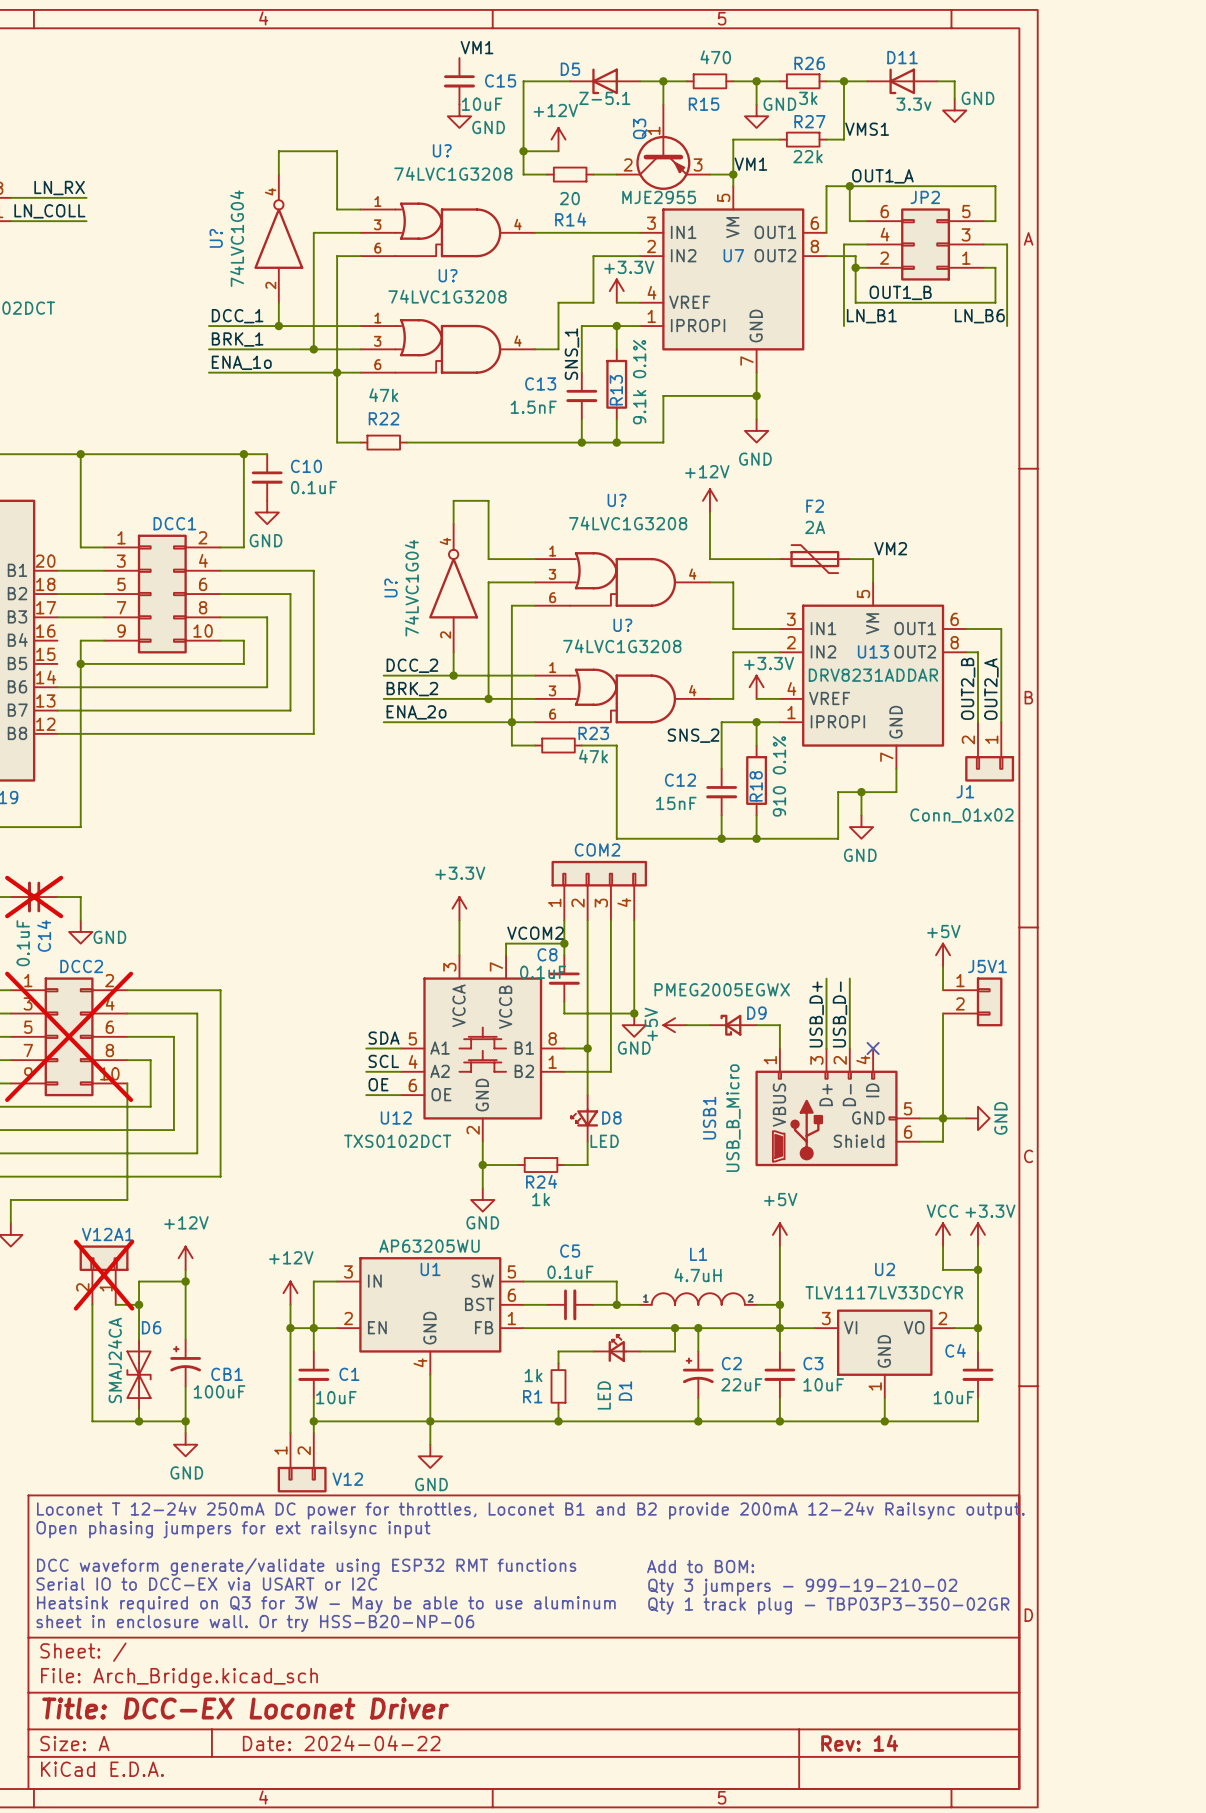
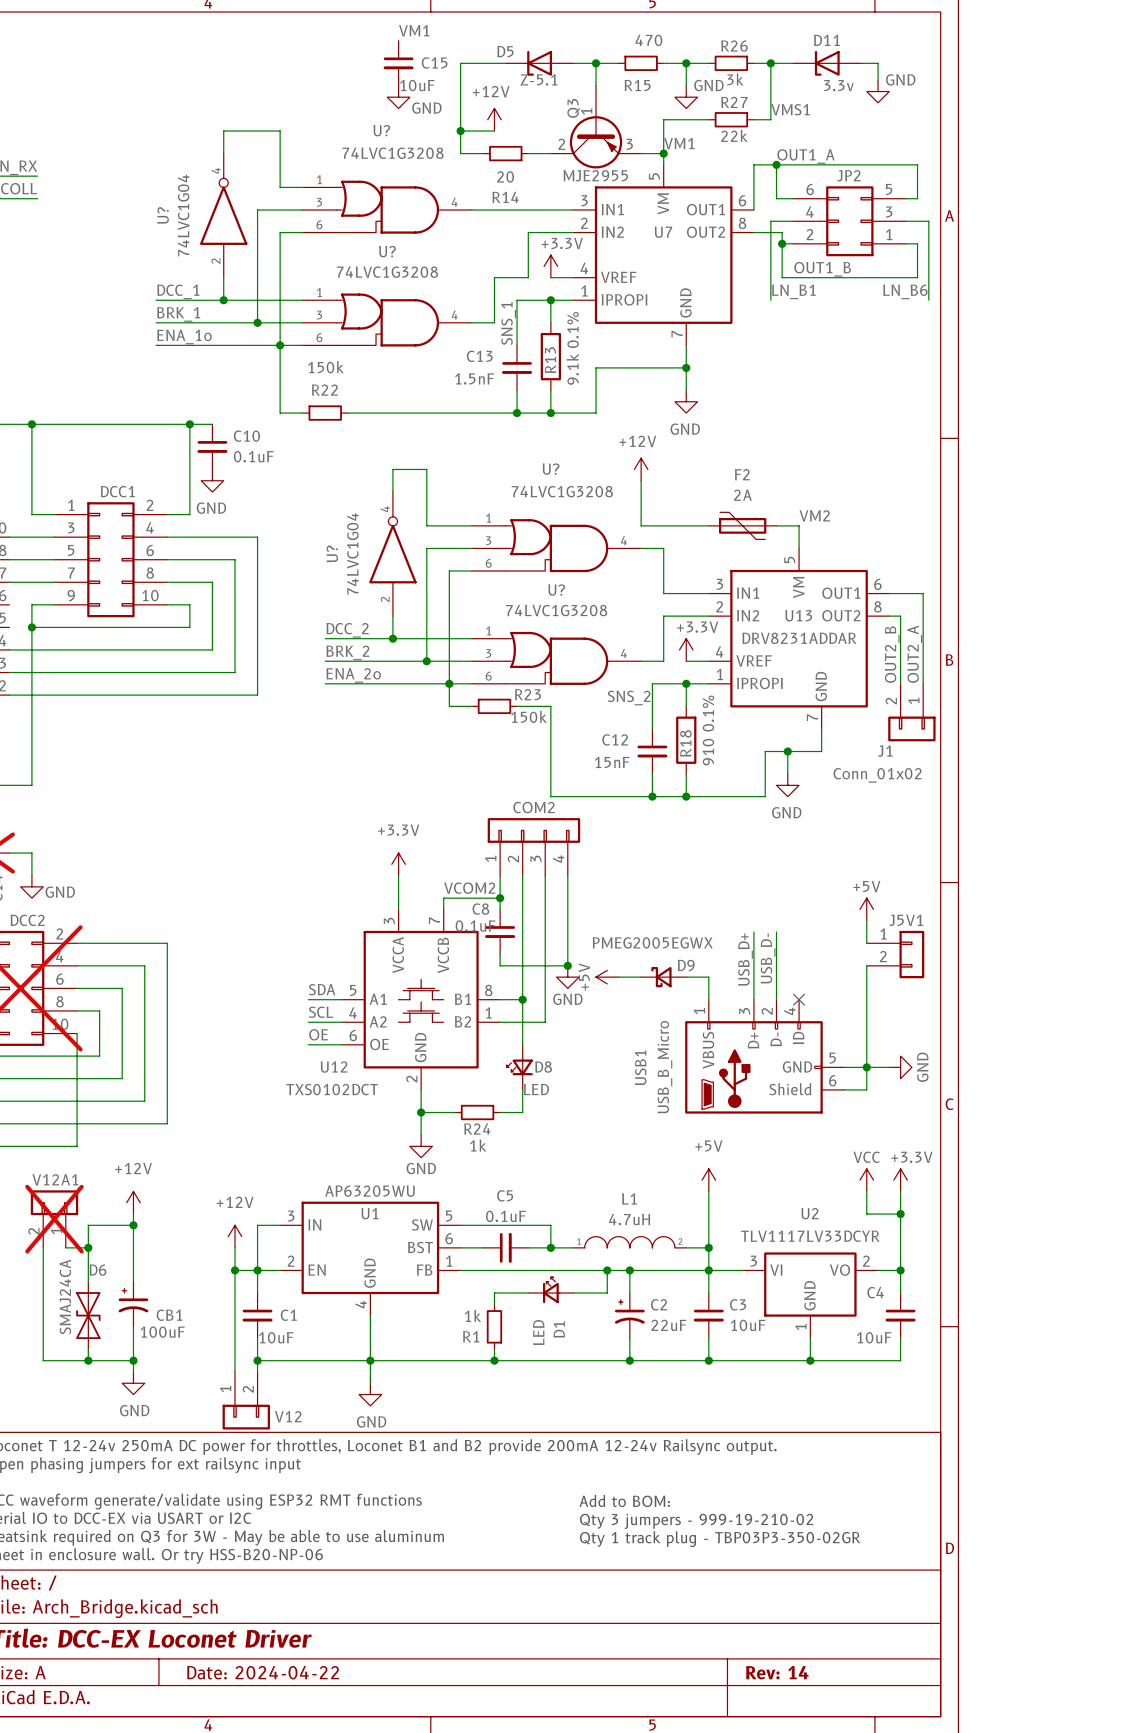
R22 value: 47k (383, 395) -> 150k (325, 367)
R23 value: 47k (593, 756) -> 150k (529, 716)

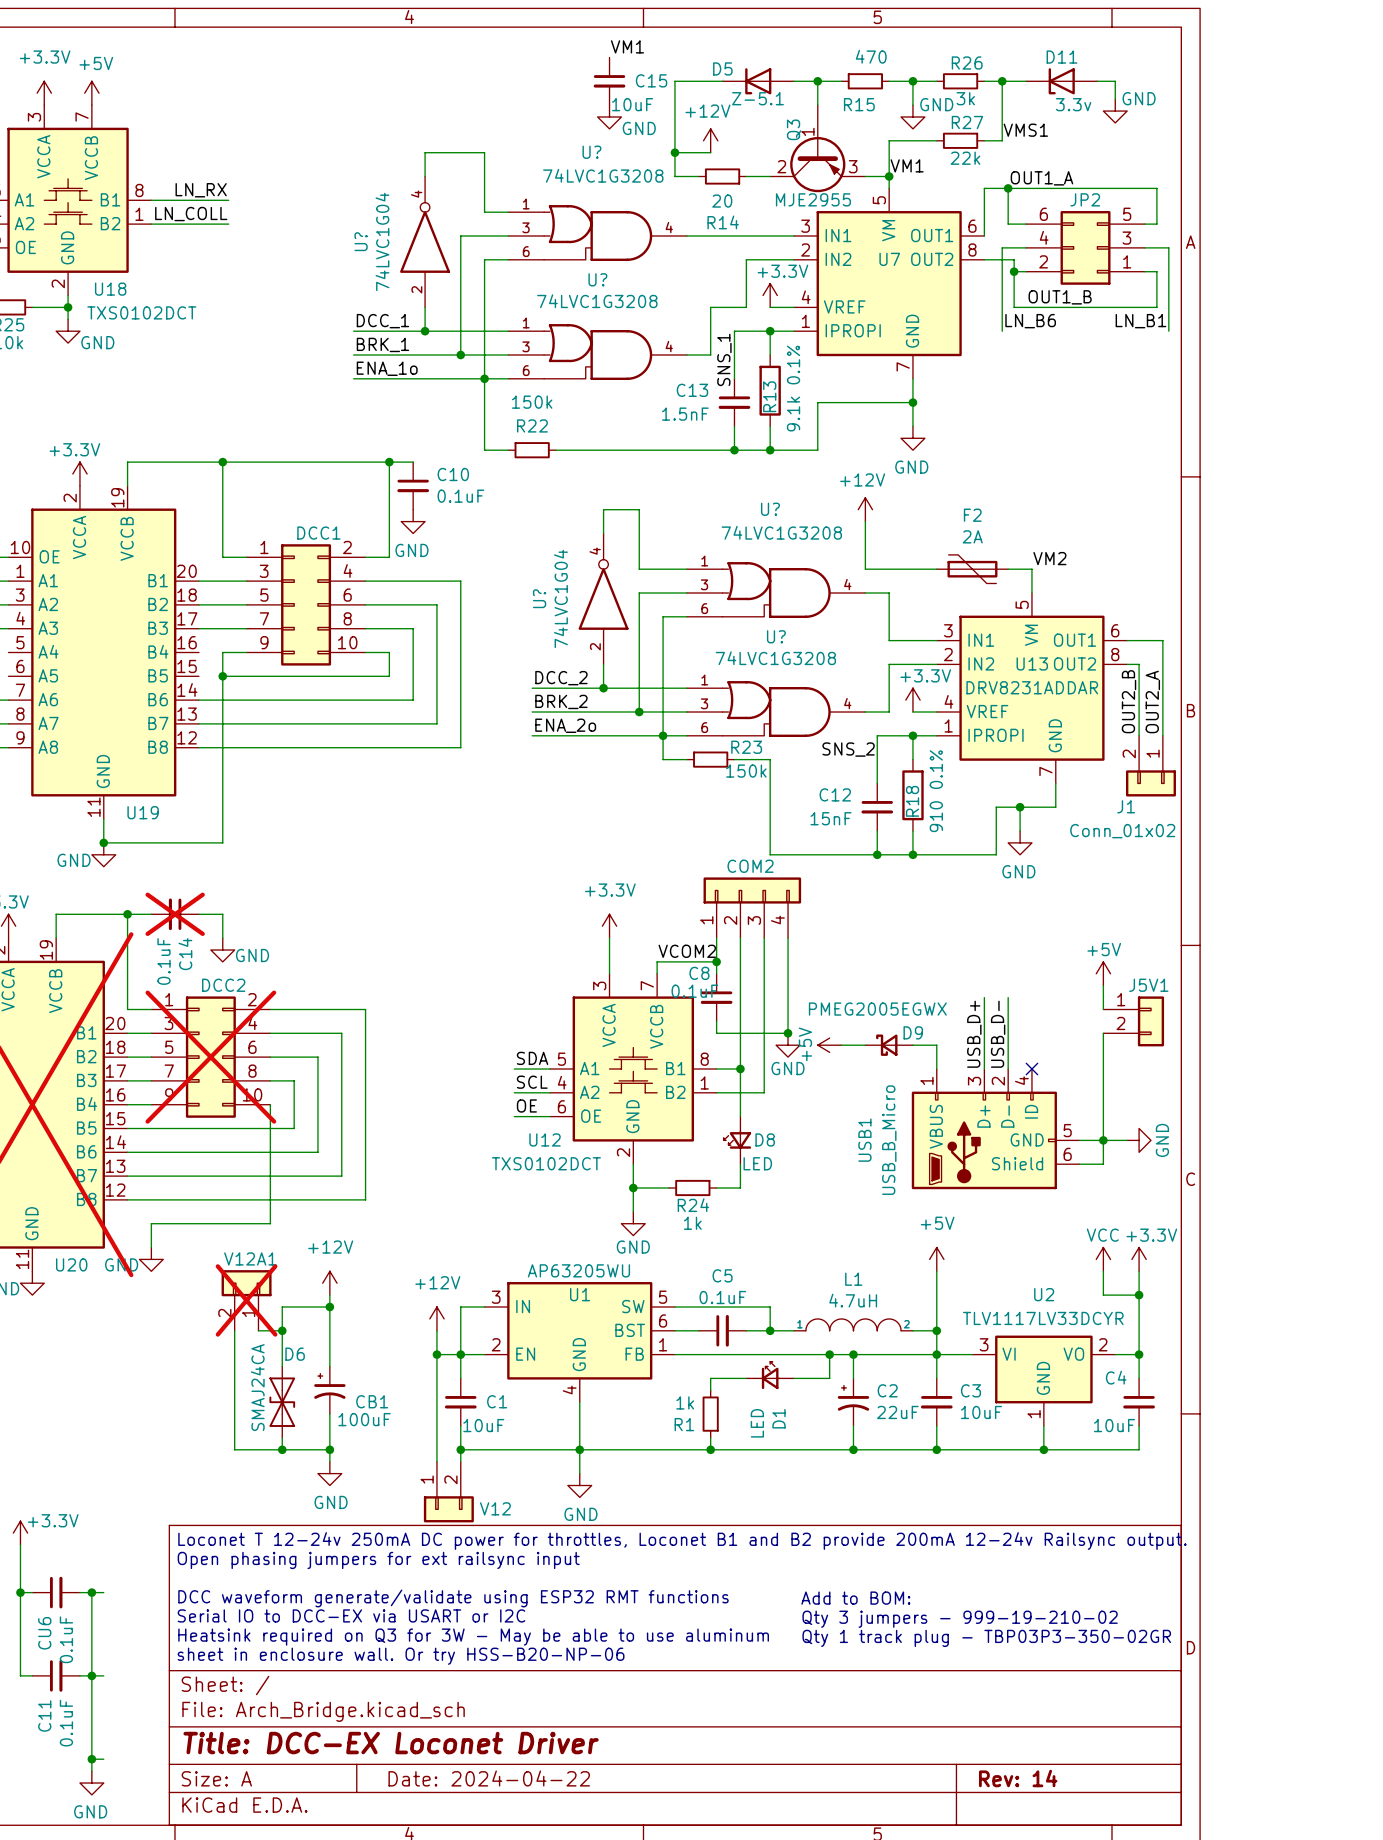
label: LN_B1 (793, 291) -> LN_B6 (1030, 321)
label: LN_B6 (905, 291) -> LN_B1 (1140, 321)

